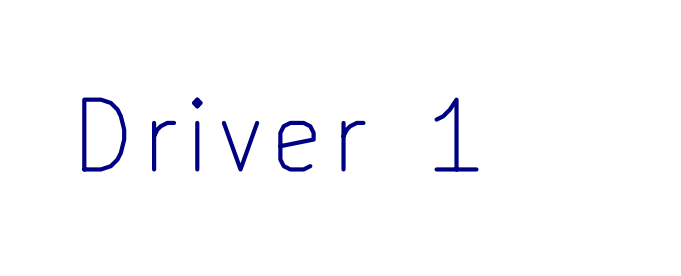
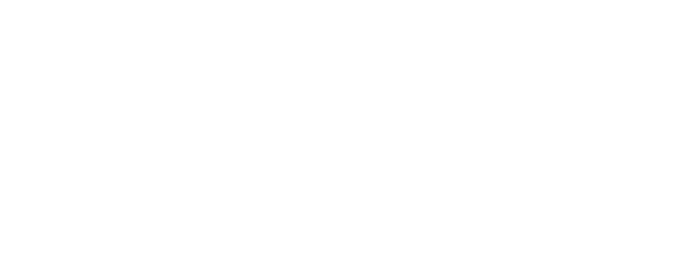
text: Driver 1 (280, 134) -> none

